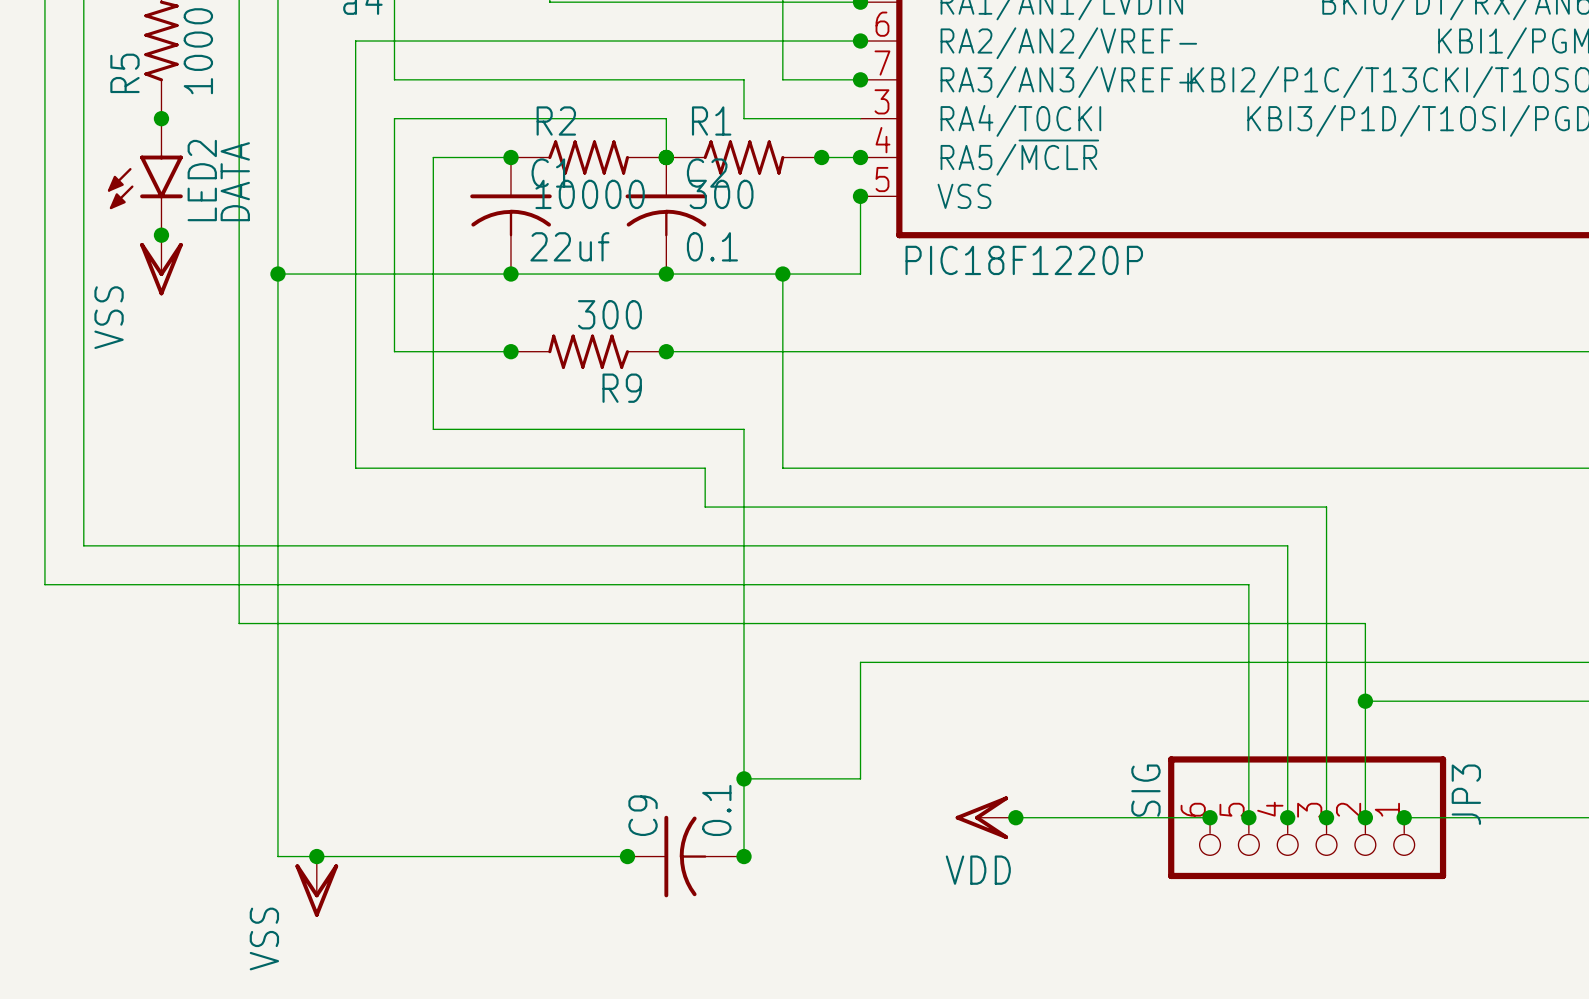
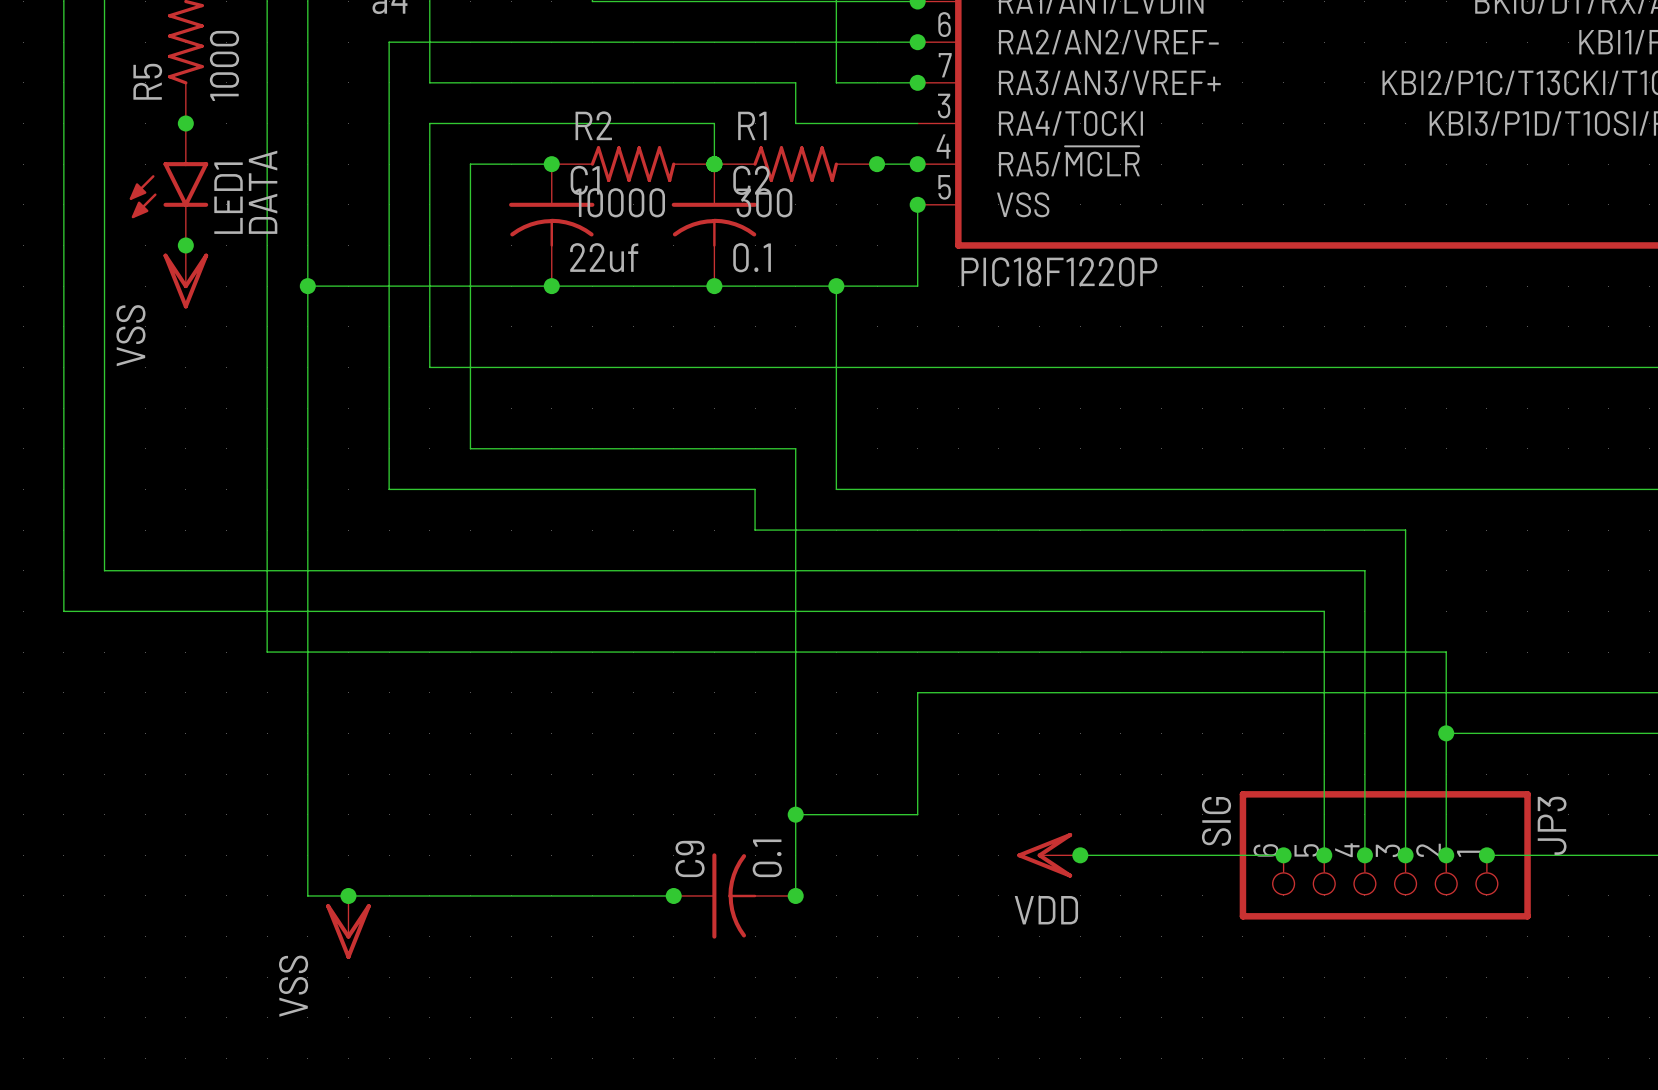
LED2 name: LED2 (202, 180) -> LED1 (228, 198)
junction: (510, 351) -> none
R9: 300 (588, 351) -> none
junction: (666, 351) -> none

